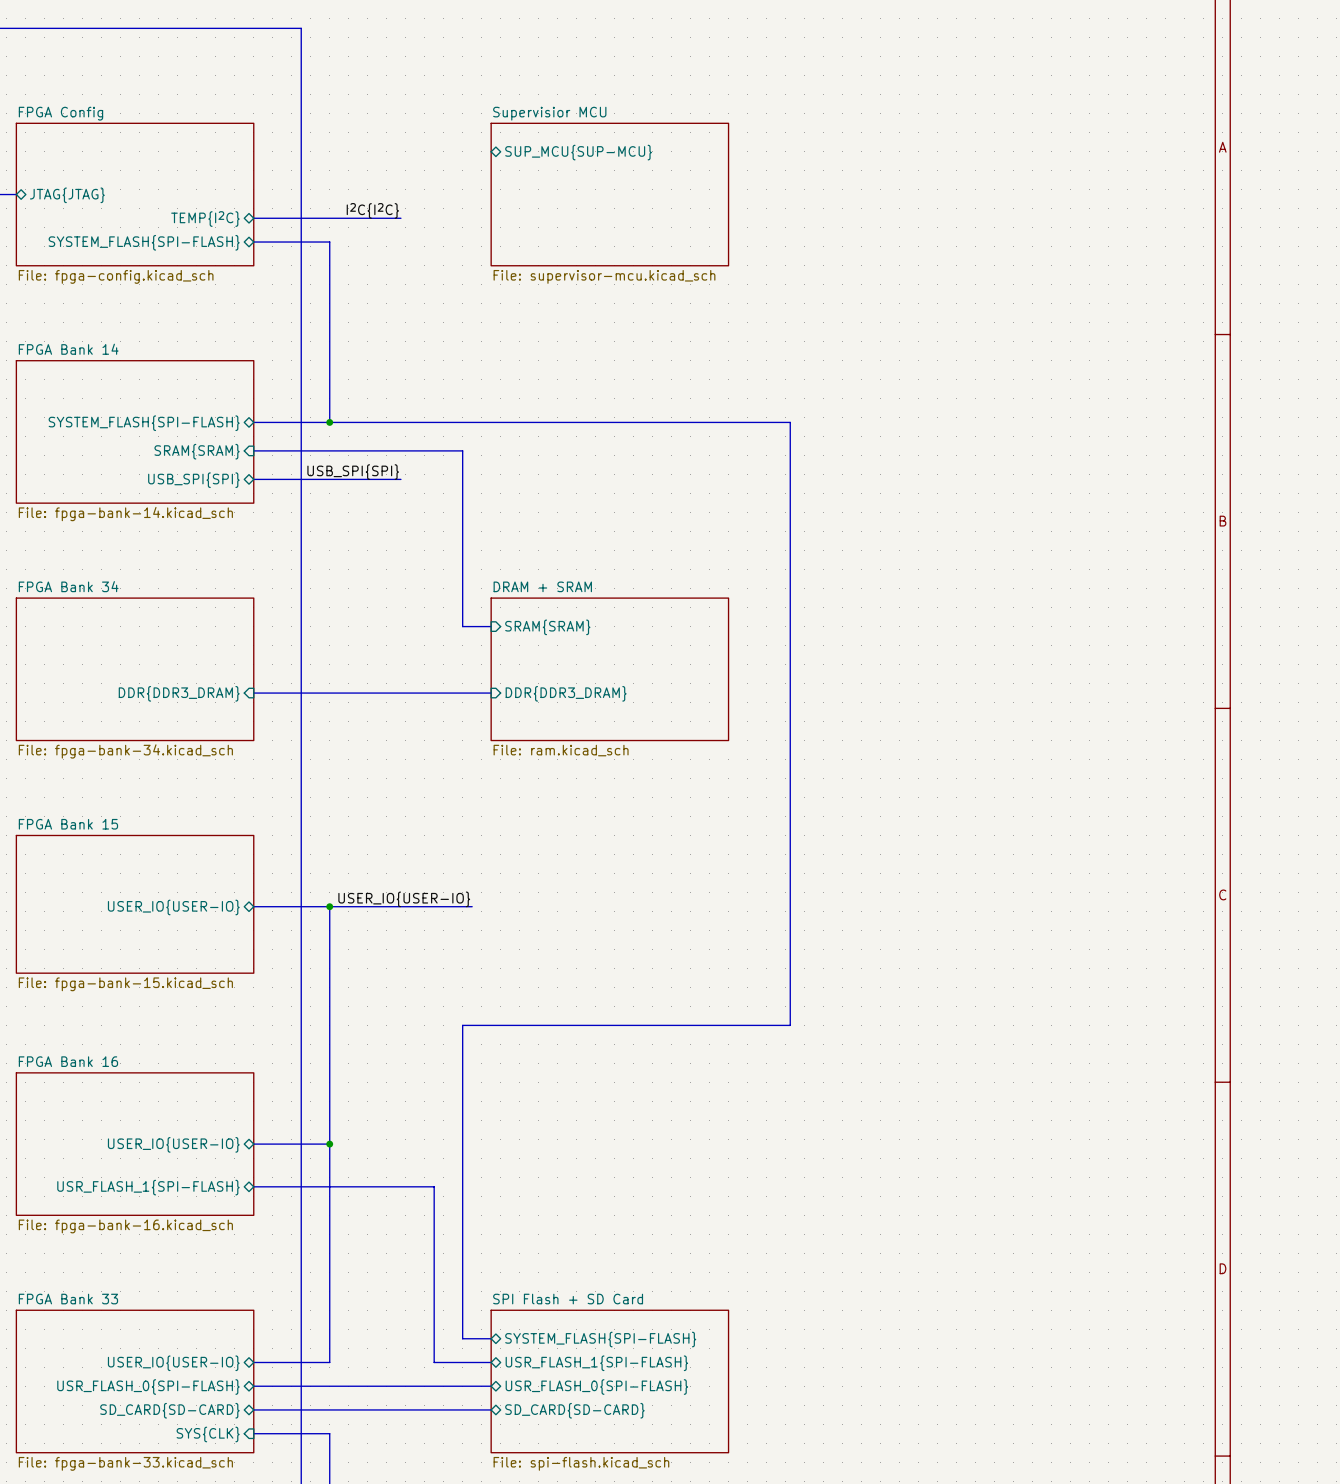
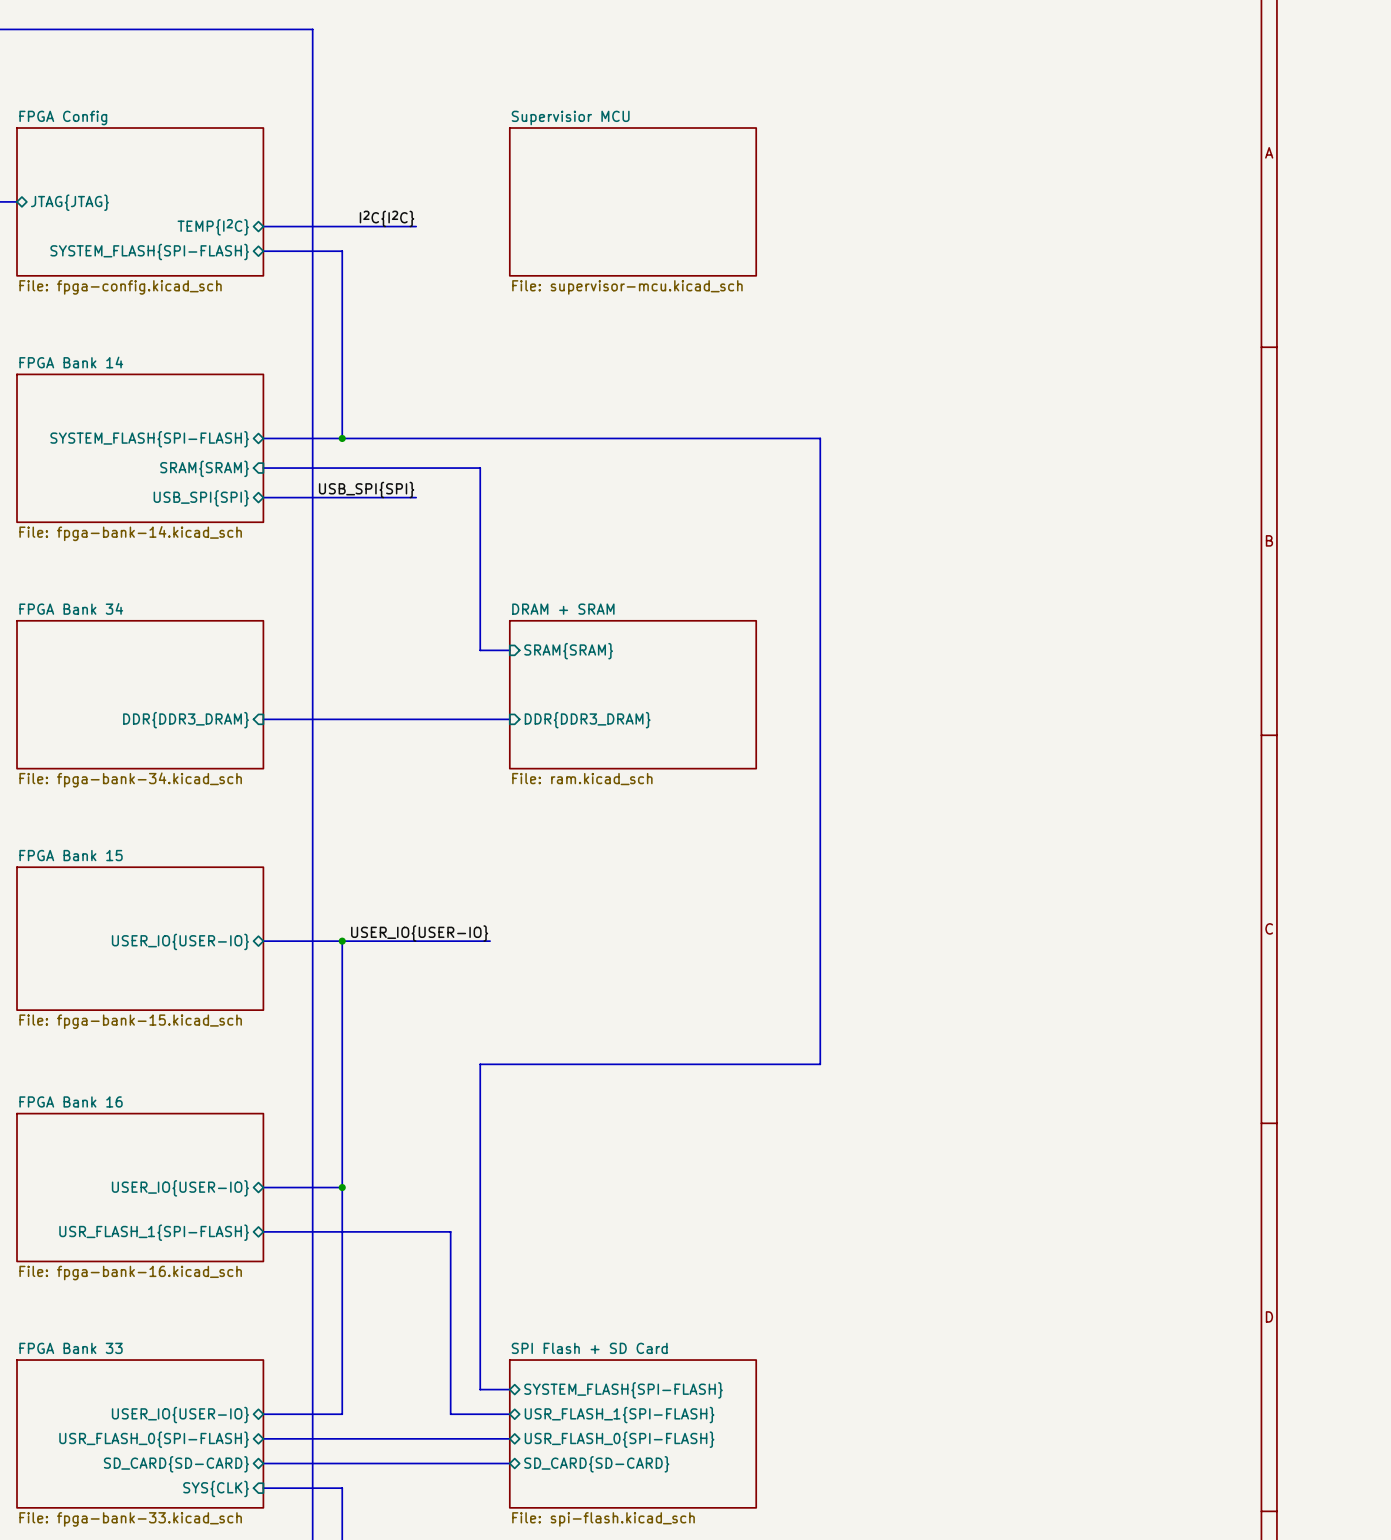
sheet pin: SUP_MCU{SUP-MCU} (578, 152) -> none

